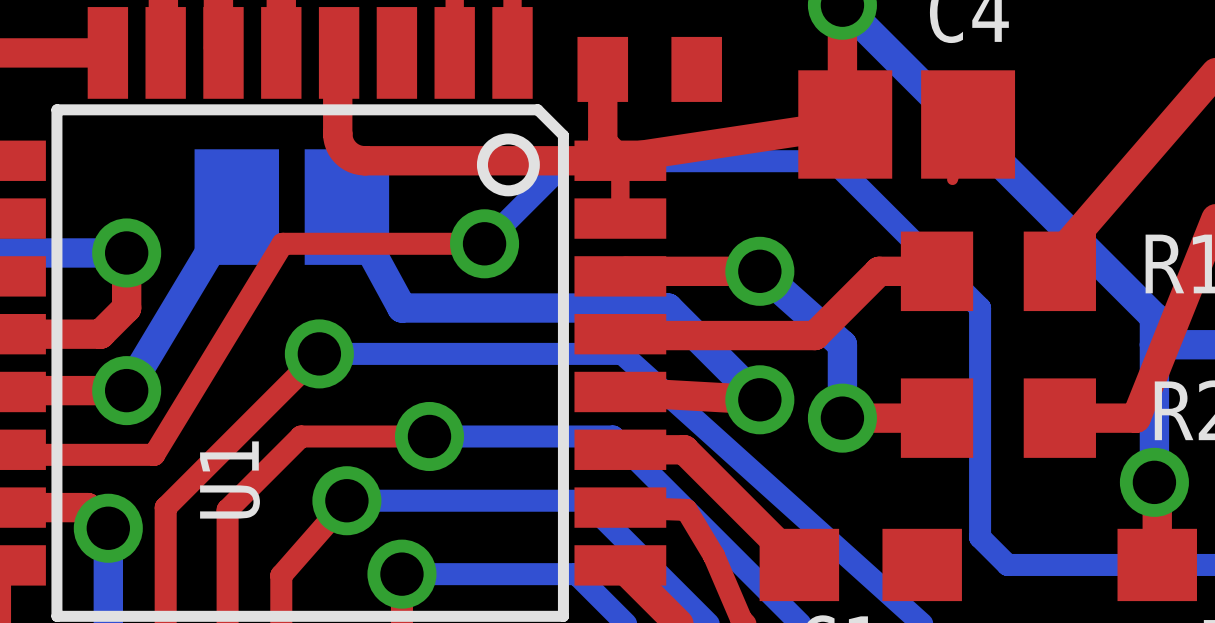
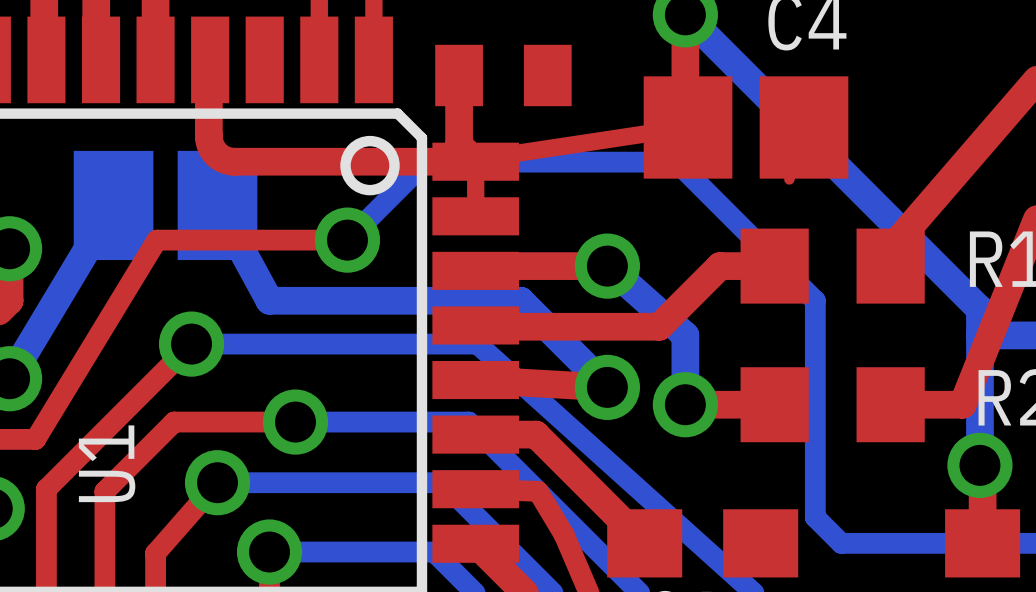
top track width: thick (845, 124) (602, 161) -> thin (688, 127) (458, 162)

